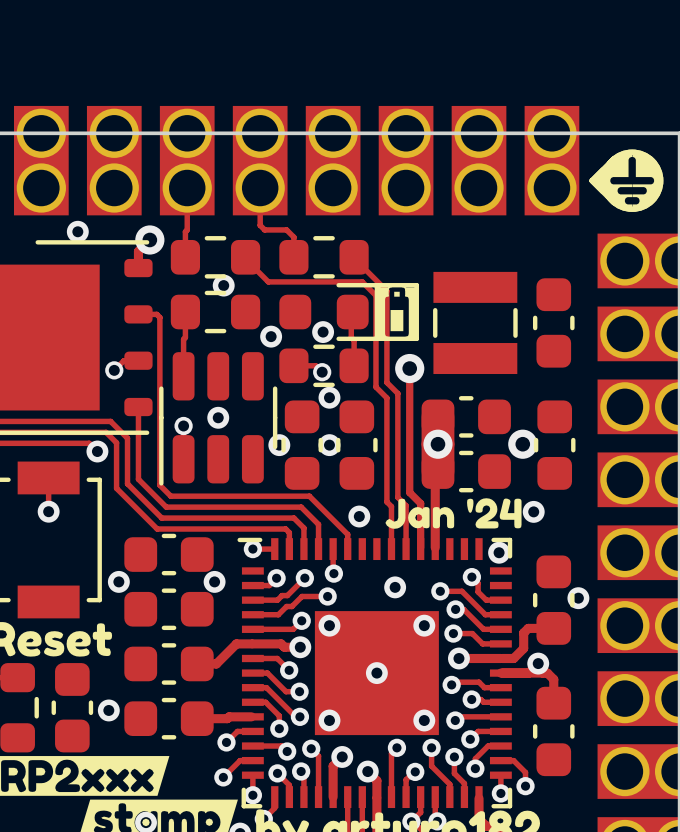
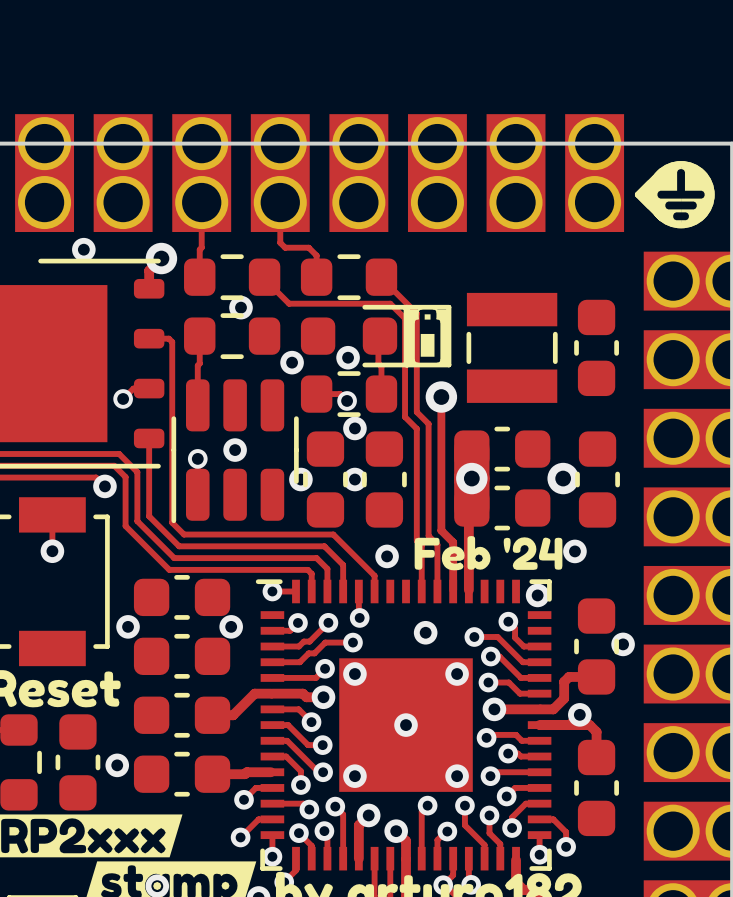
drawing shape: [385, 498, 522, 529] -> [414, 536, 563, 571]

